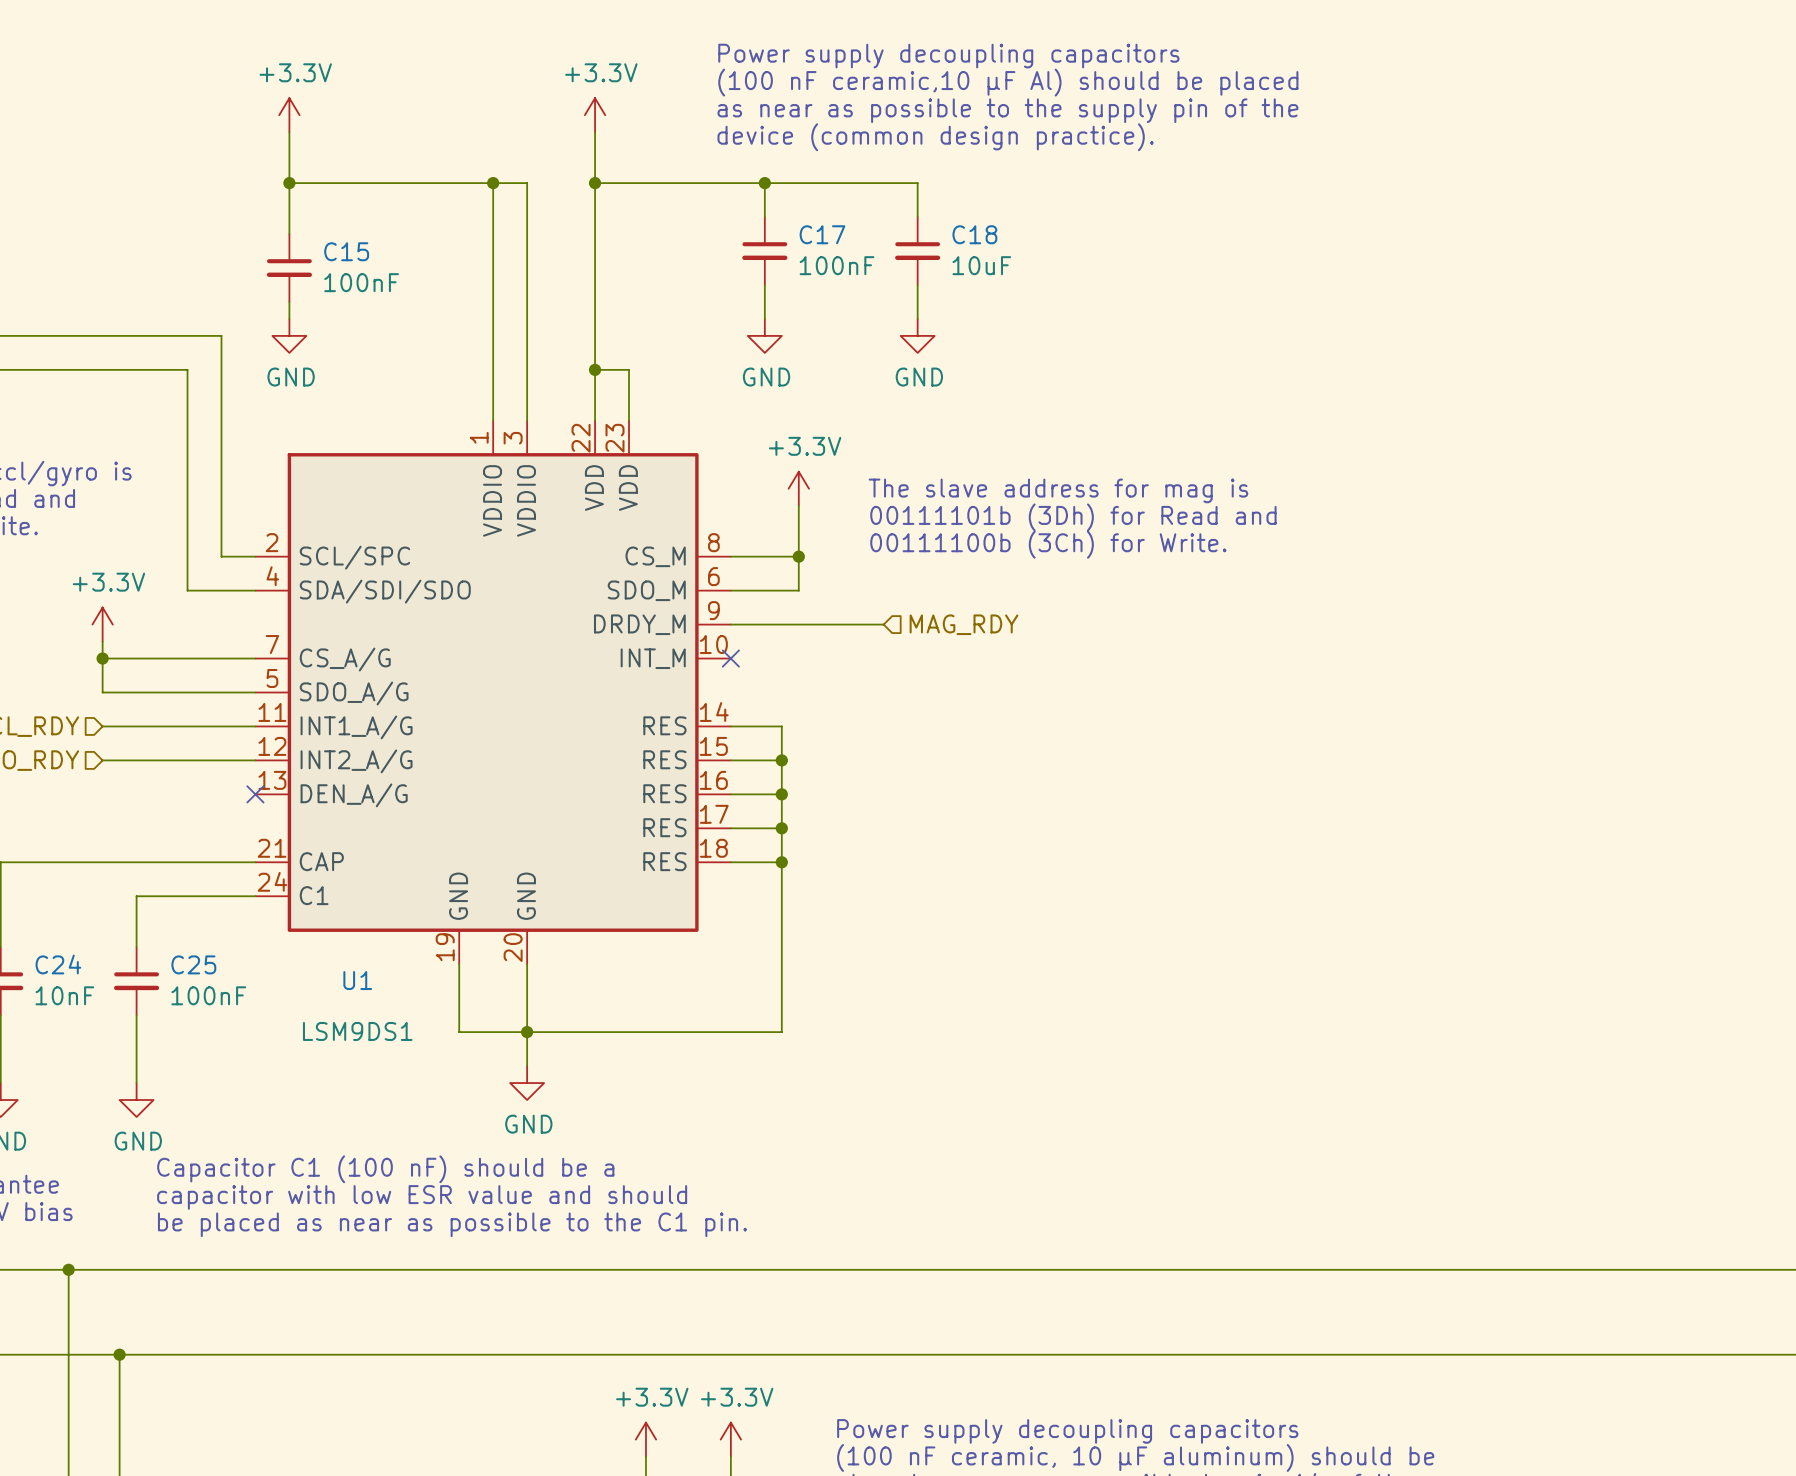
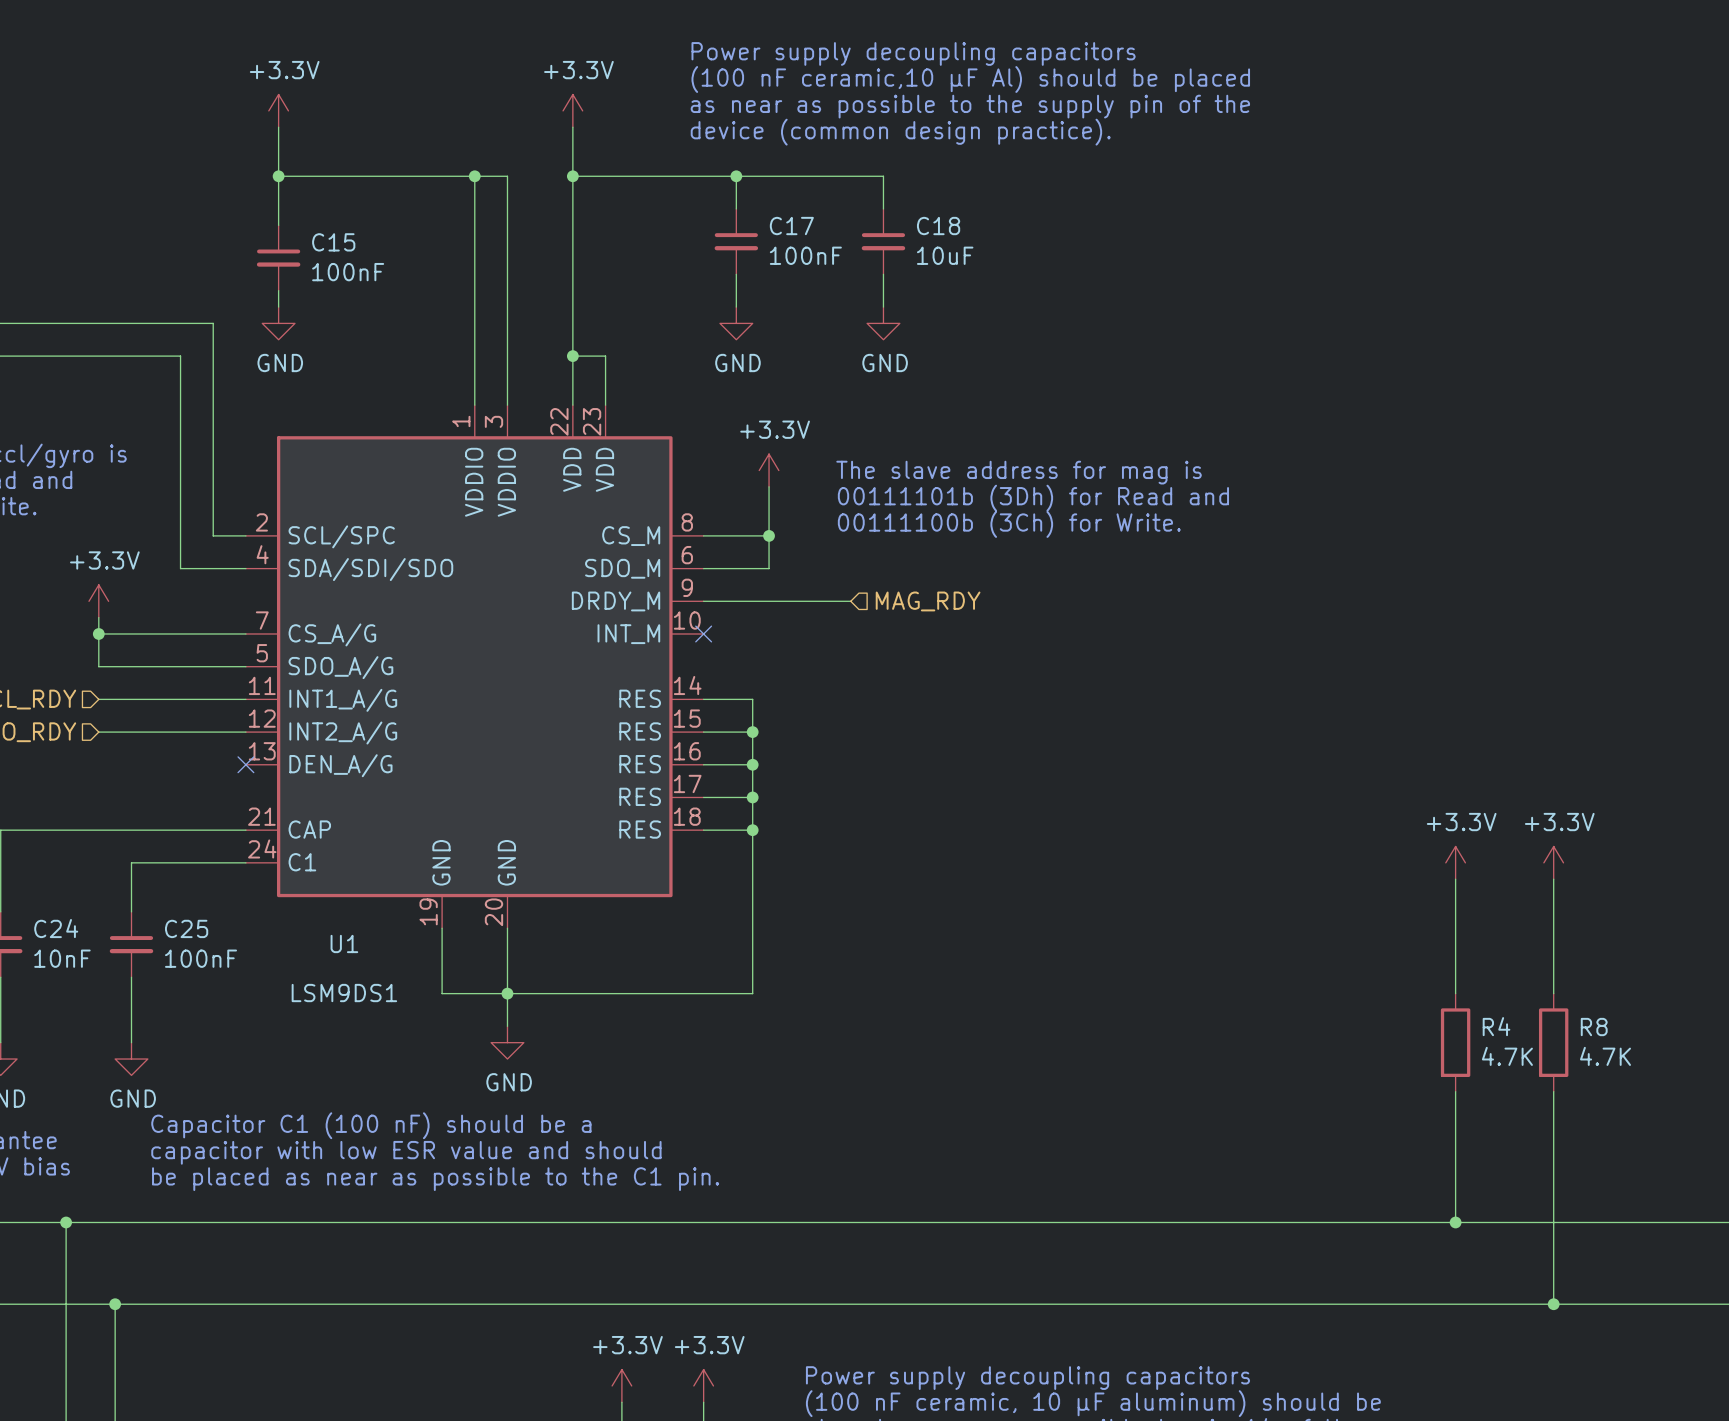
power symbol: none -> +3.3V (1455, 862)
power symbol: none -> +3.3V (1553, 862)
wire: none -> (1455, 879) (1455, 993)
wire: none -> (1553, 879) (1553, 993)
R4: none -> 4.7K (1455, 1042)
R8: none -> 4.7K (1553, 1042)
wire: none -> (1455, 1091) (1455, 1222)
wire: none -> (1553, 1091) (1553, 1304)
junction: none -> (1455, 1222)
junction: none -> (1553, 1304)

